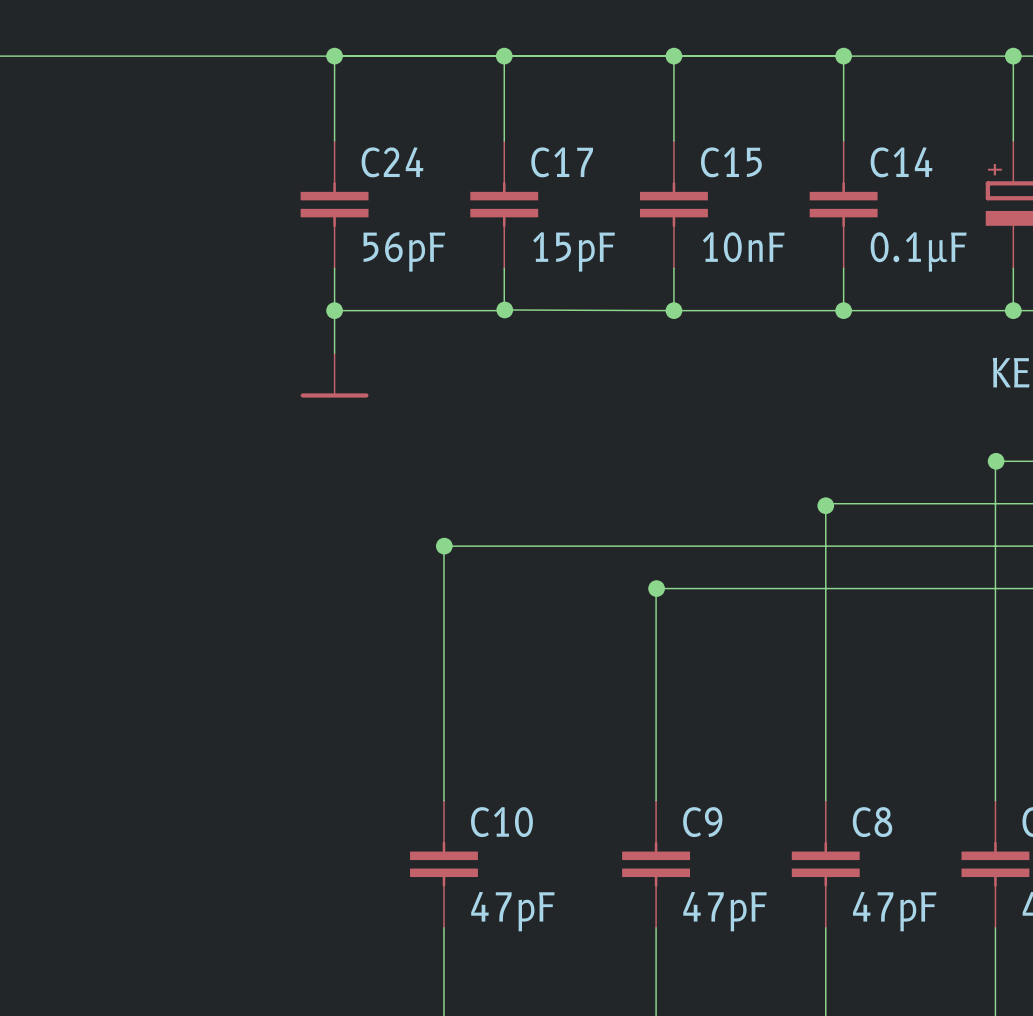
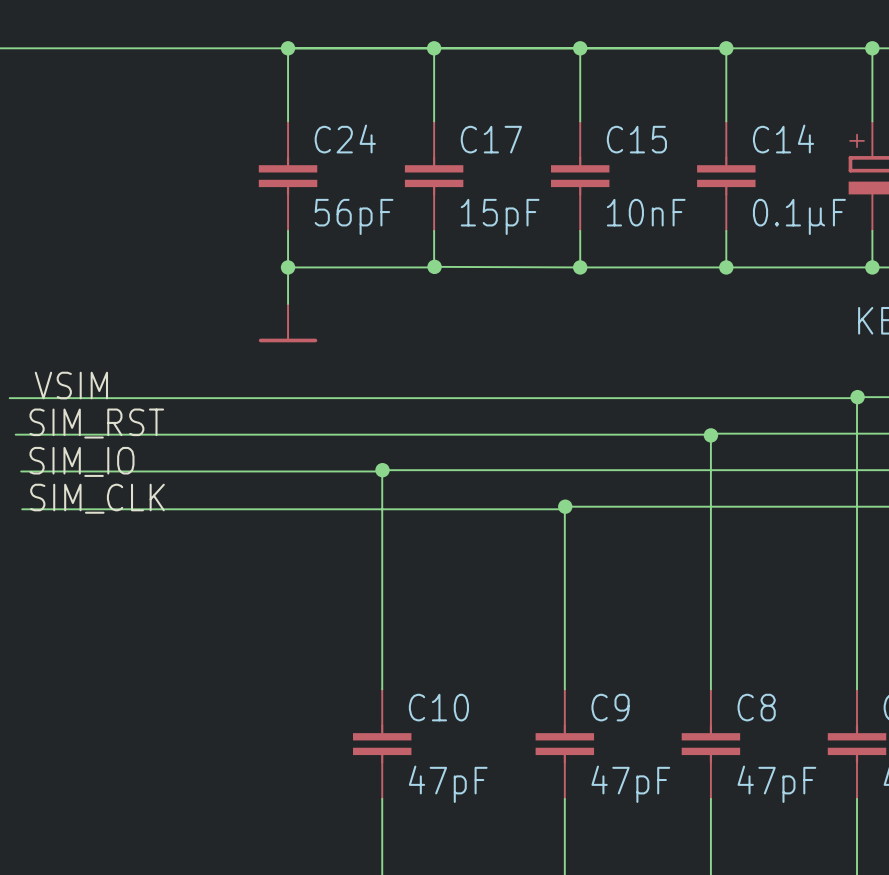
label: none -> VSIM (71, 385)
wire: none -> (9, 398) (858, 398)
label: none -> SIM_RST (96, 423)
wire: none -> (15, 434) (710, 434)
label: none -> SIM_IO (81, 461)
wire: none -> (21, 471) (382, 471)
label: none -> SIM_CLK (97, 498)
wire: none -> (22, 509) (566, 509)

